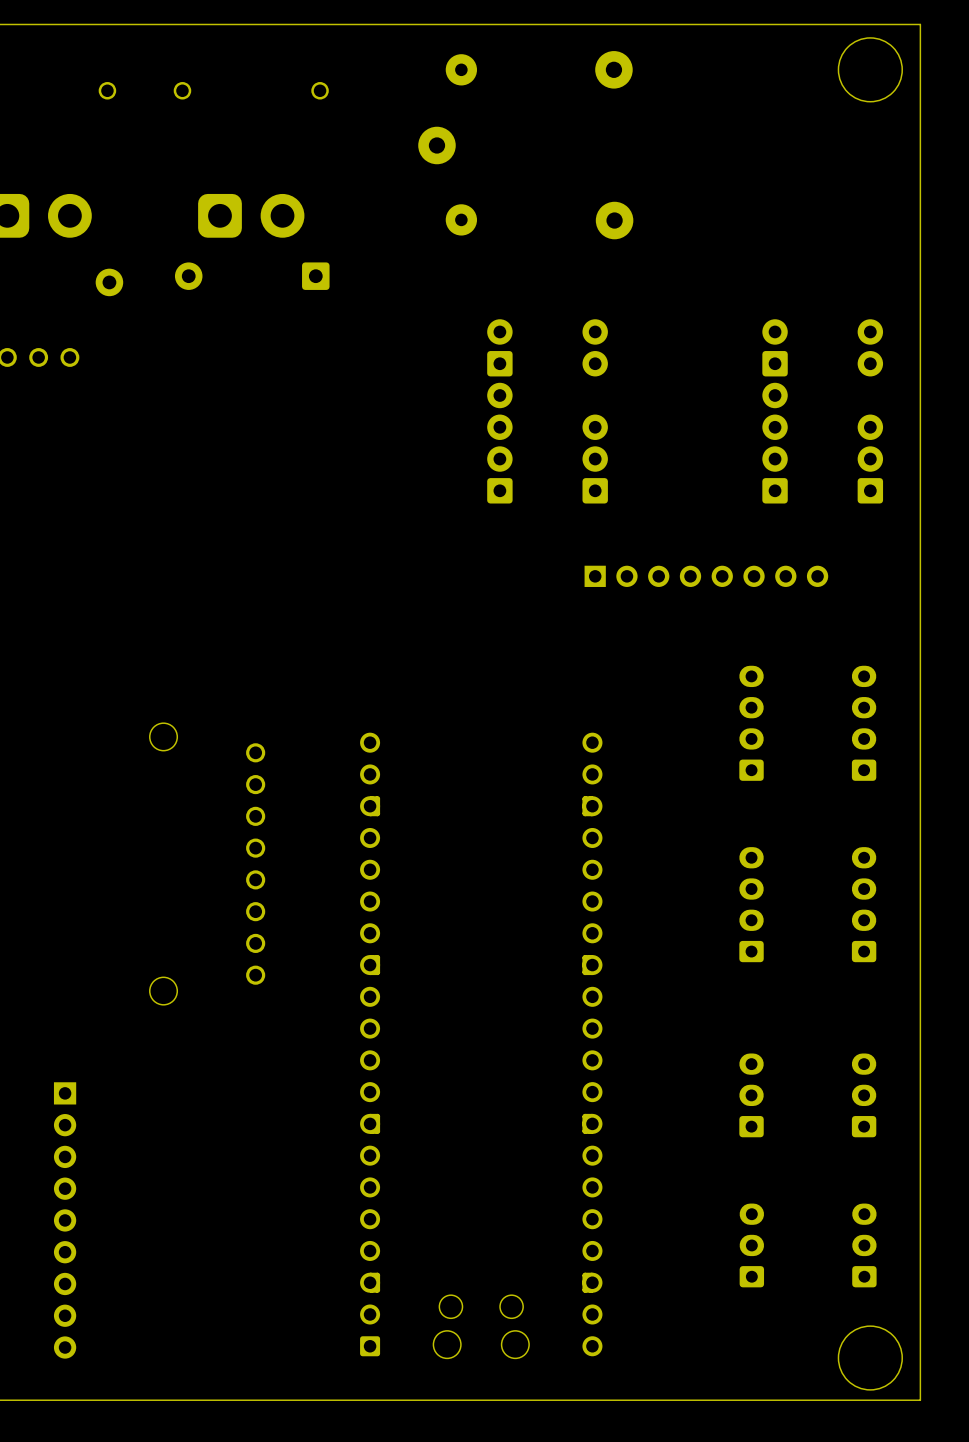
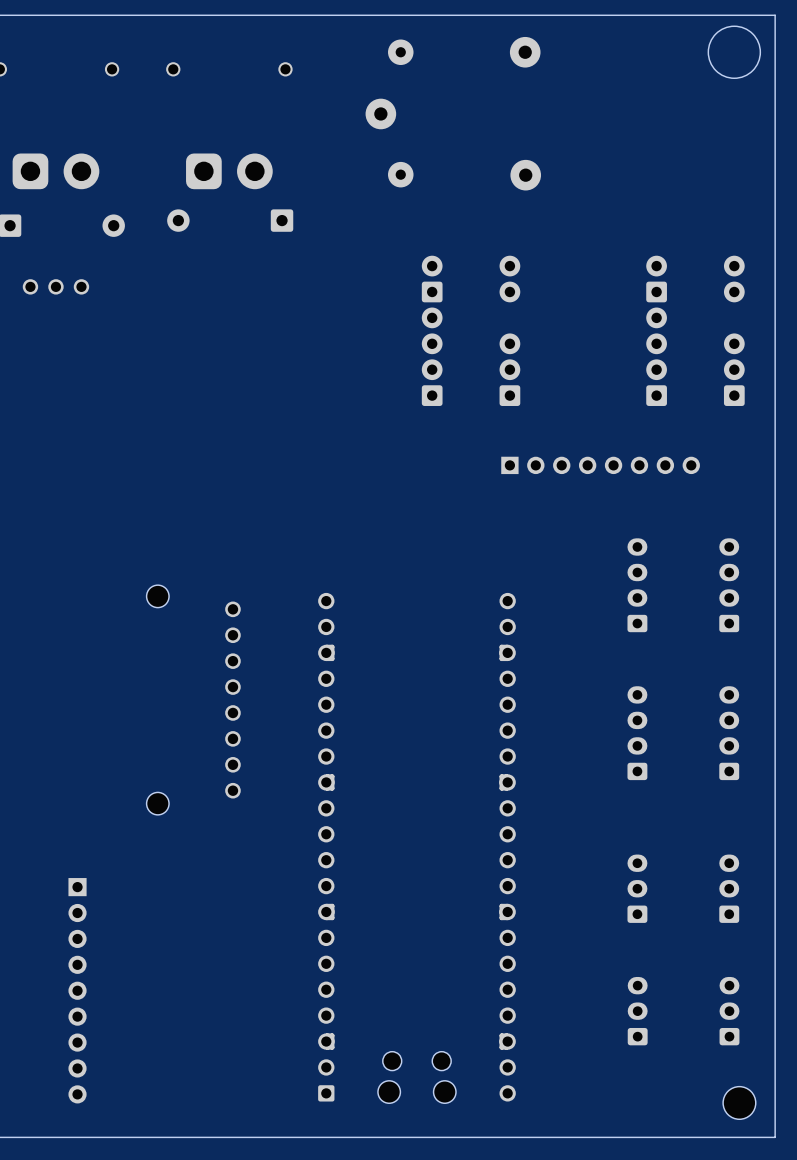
round board edge: [838, 1325, 903, 1391] -> none
part: none -> (739, 1102)

